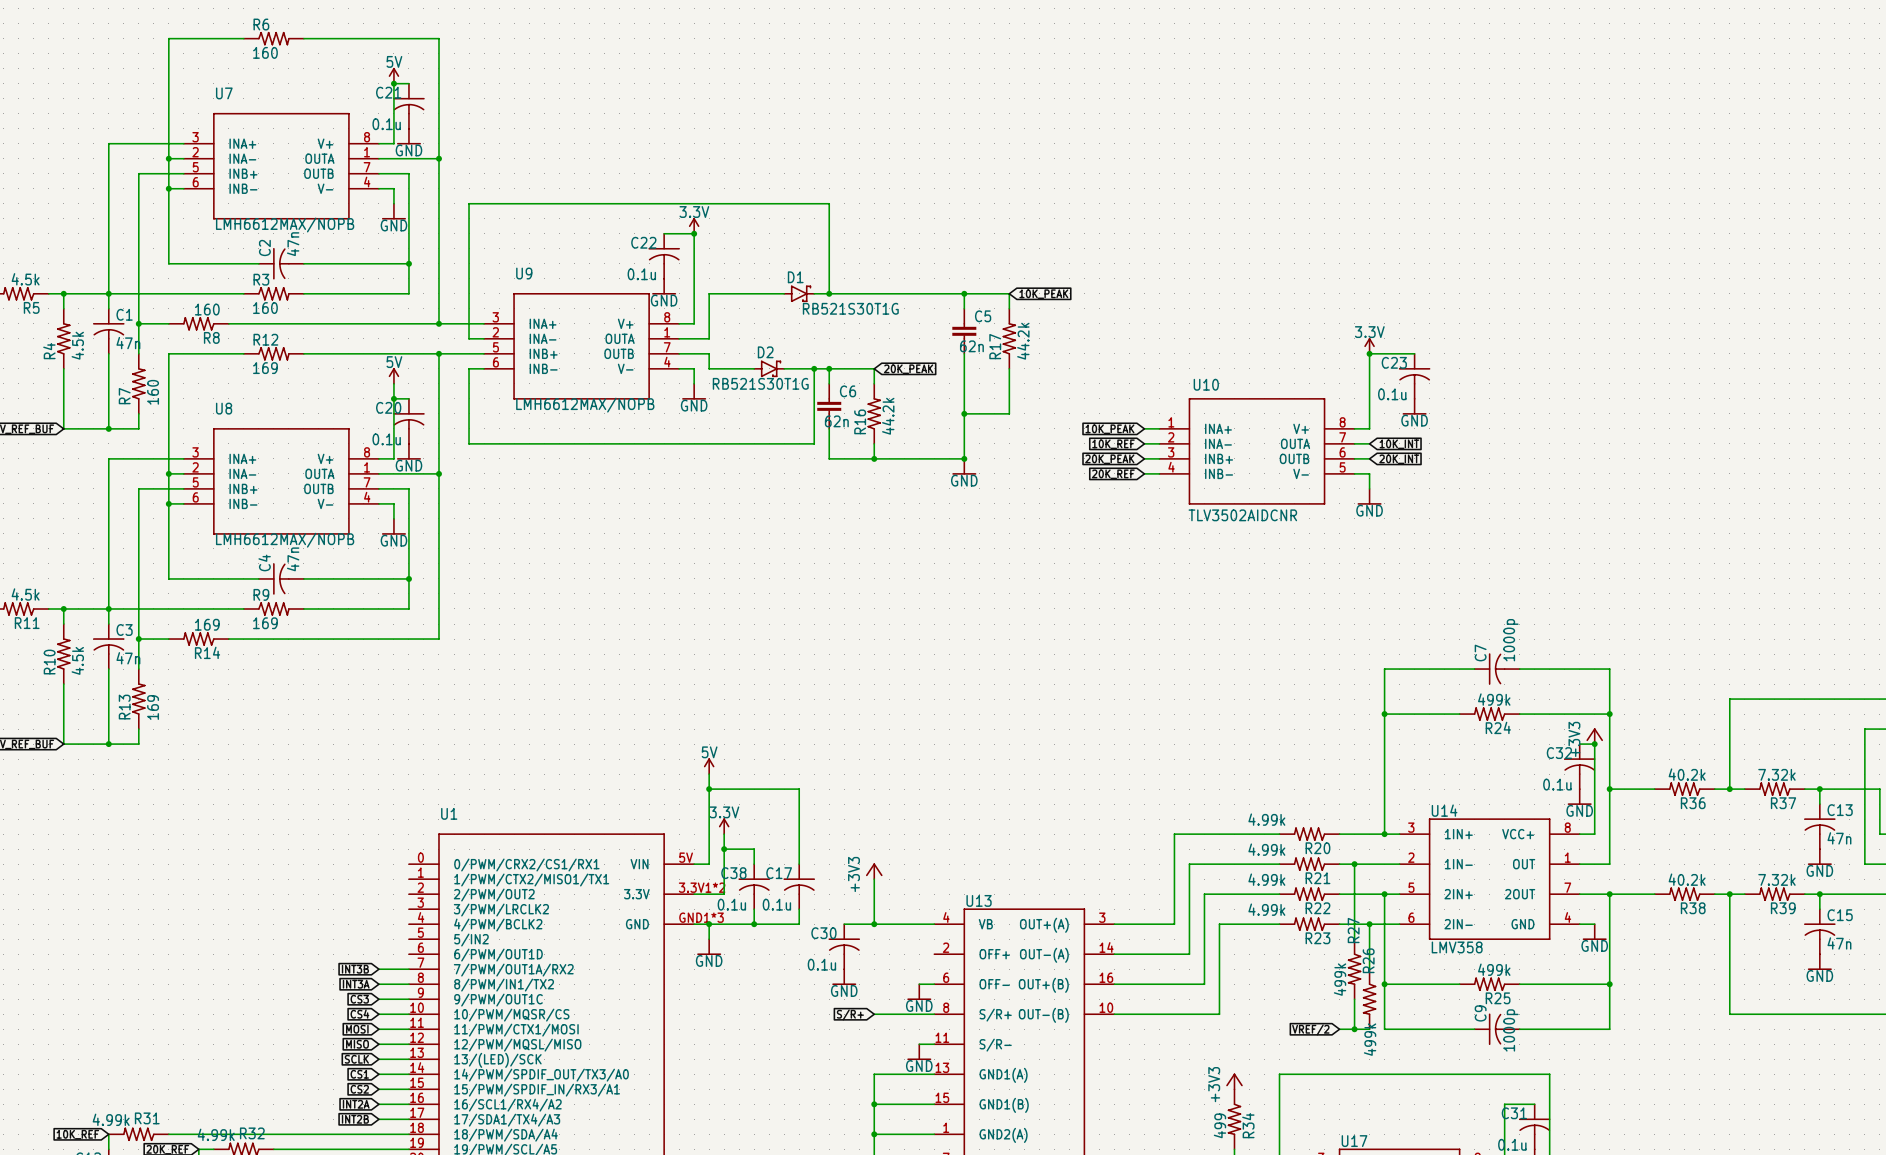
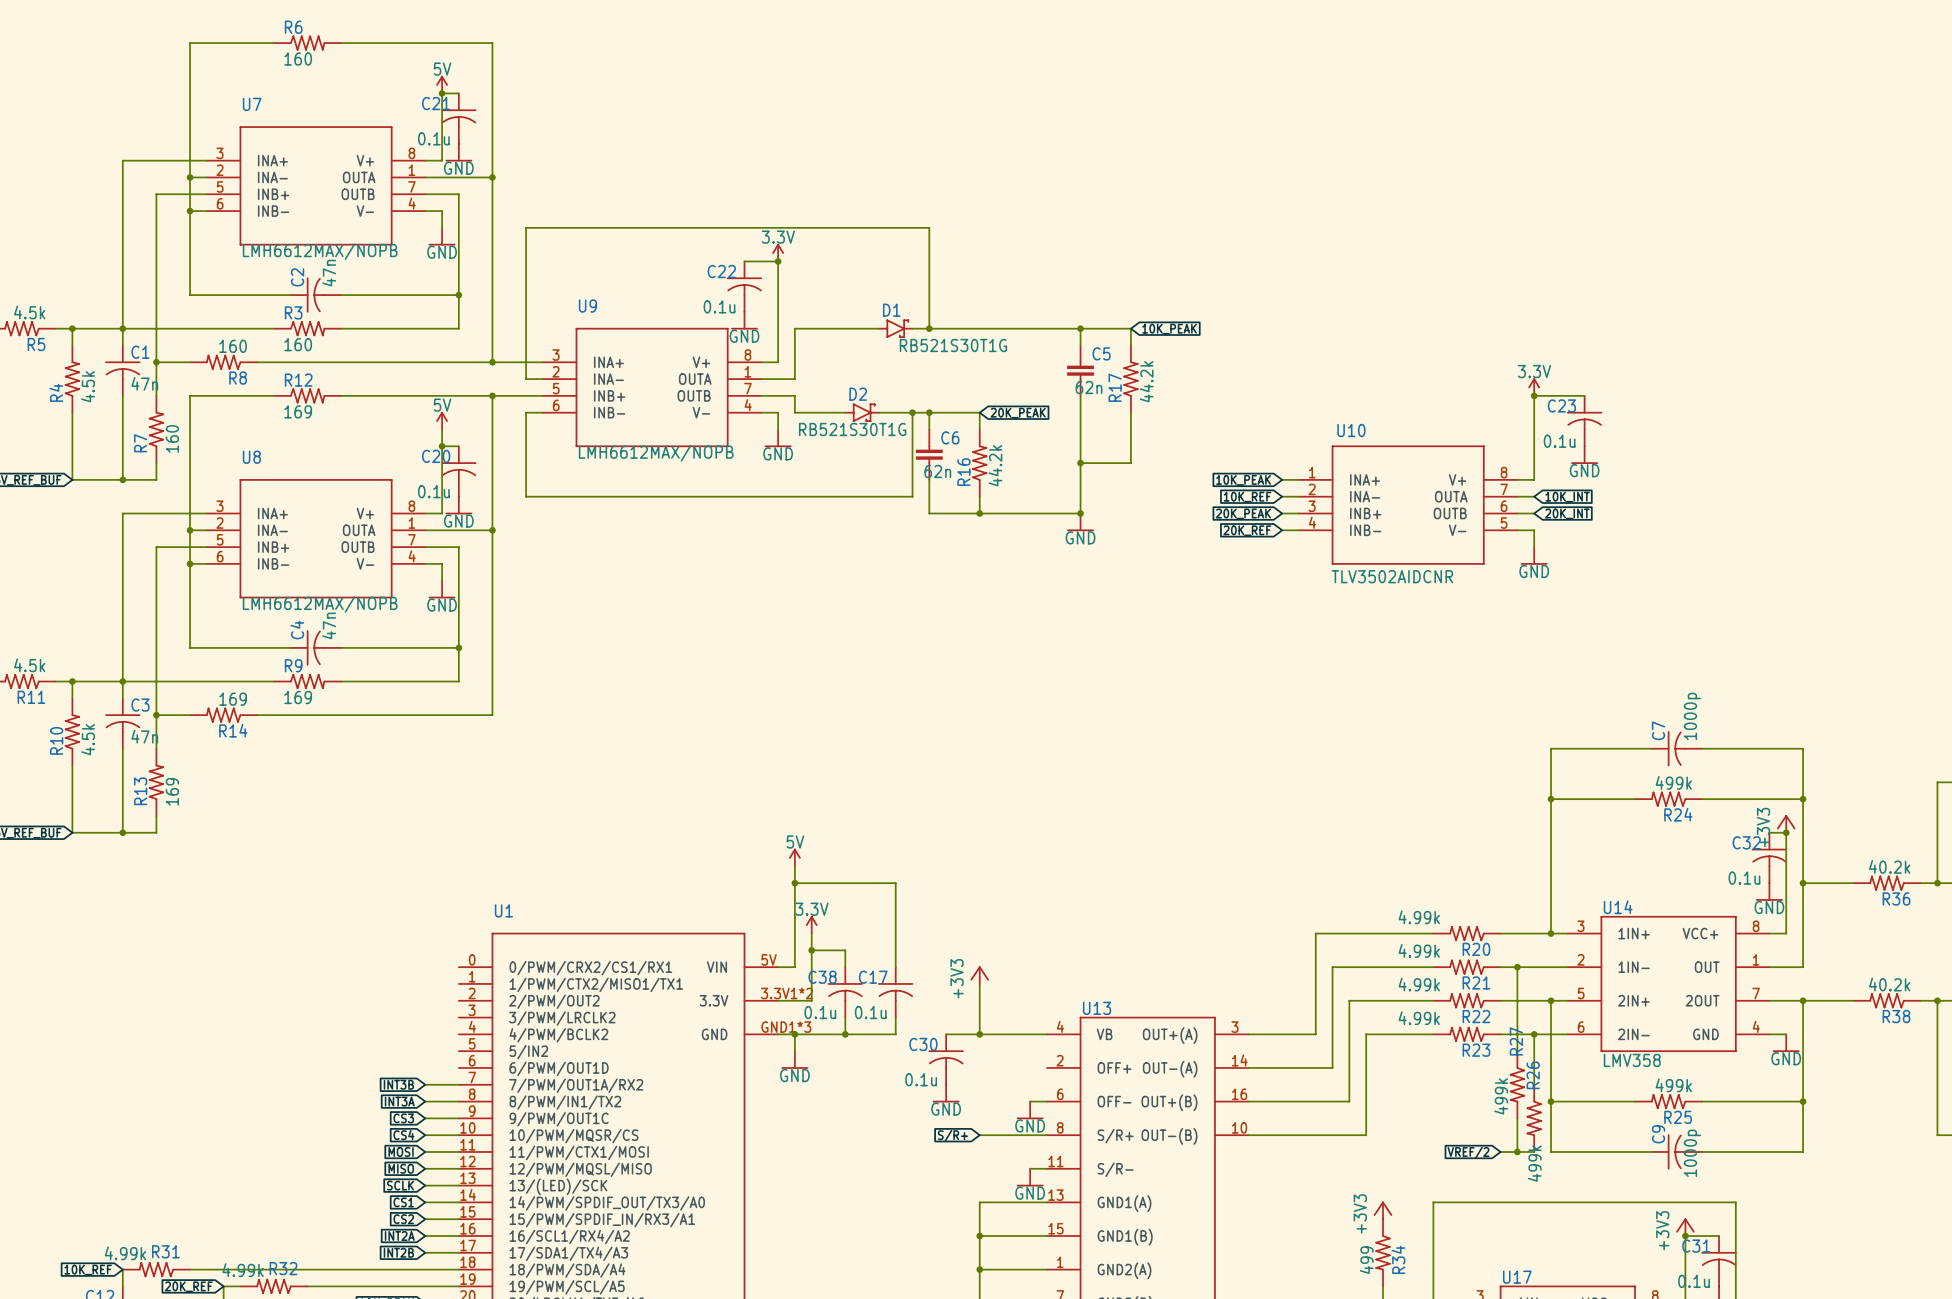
power symbol: none -> +3V3 (1685, 1227)
junction: none -> (1685, 1236)

